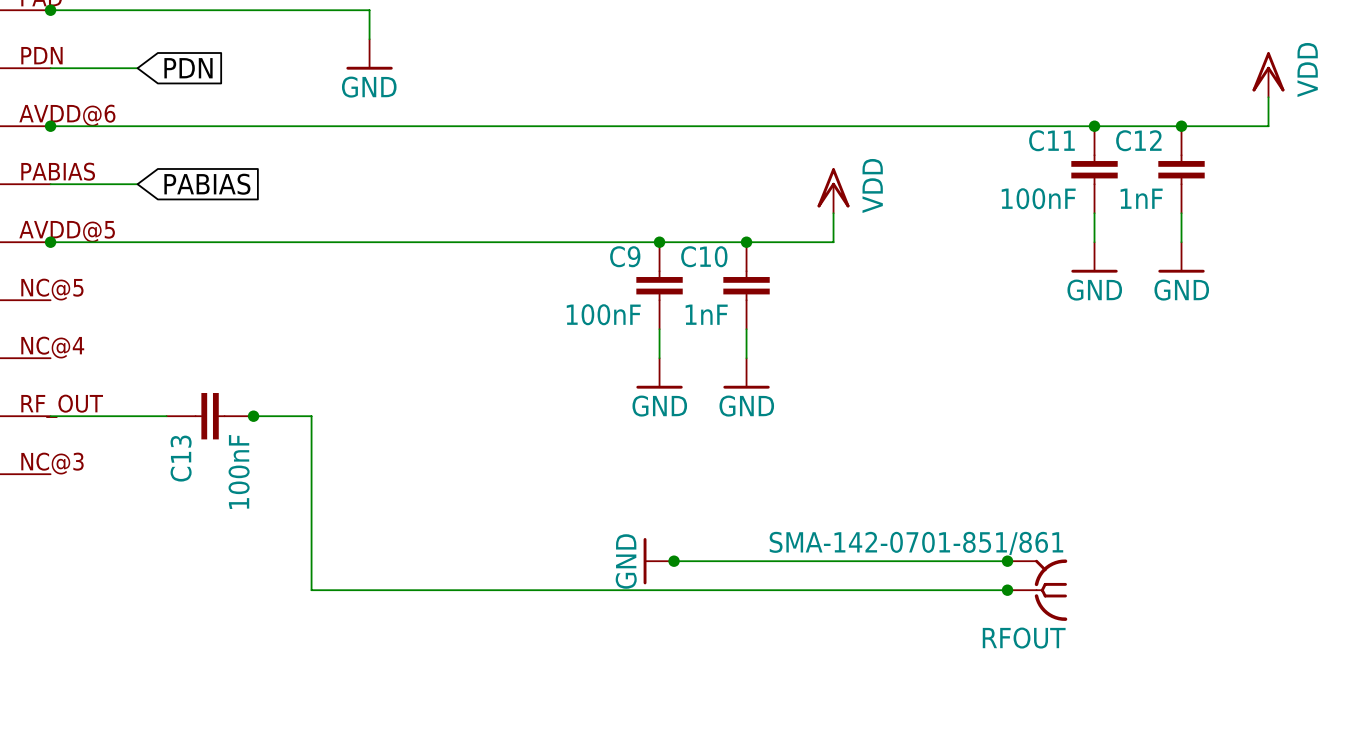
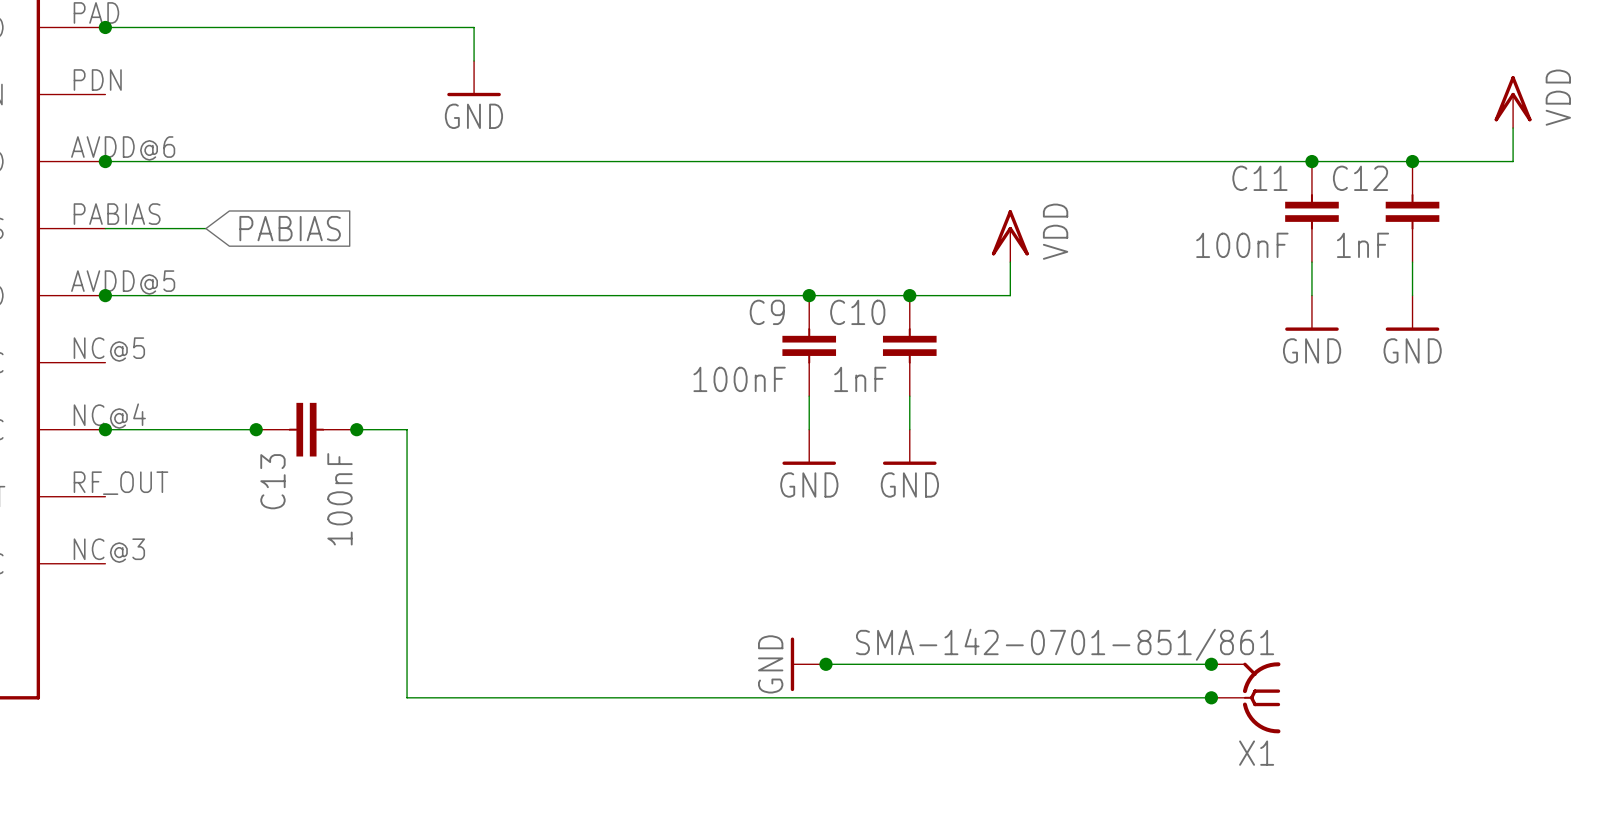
wire: (50, 68) (137, 68) -> none
global label: PDN (188, 68) -> none
wire: none -> (105, 429) (256, 429)
junction: none -> (105, 429)
junction: none -> (256, 429)
junction: none -> (356, 429)
wire: (50, 416) (166, 416) -> none
C13 position: (210, 416) -> (306, 429)
wire: (253, 416) (311, 416) -> (356, 429) (407, 429) (407, 496)
junction: (253, 416) -> none
RFOUT name: RFOUT (1024, 638) -> X1 (1256, 753)

